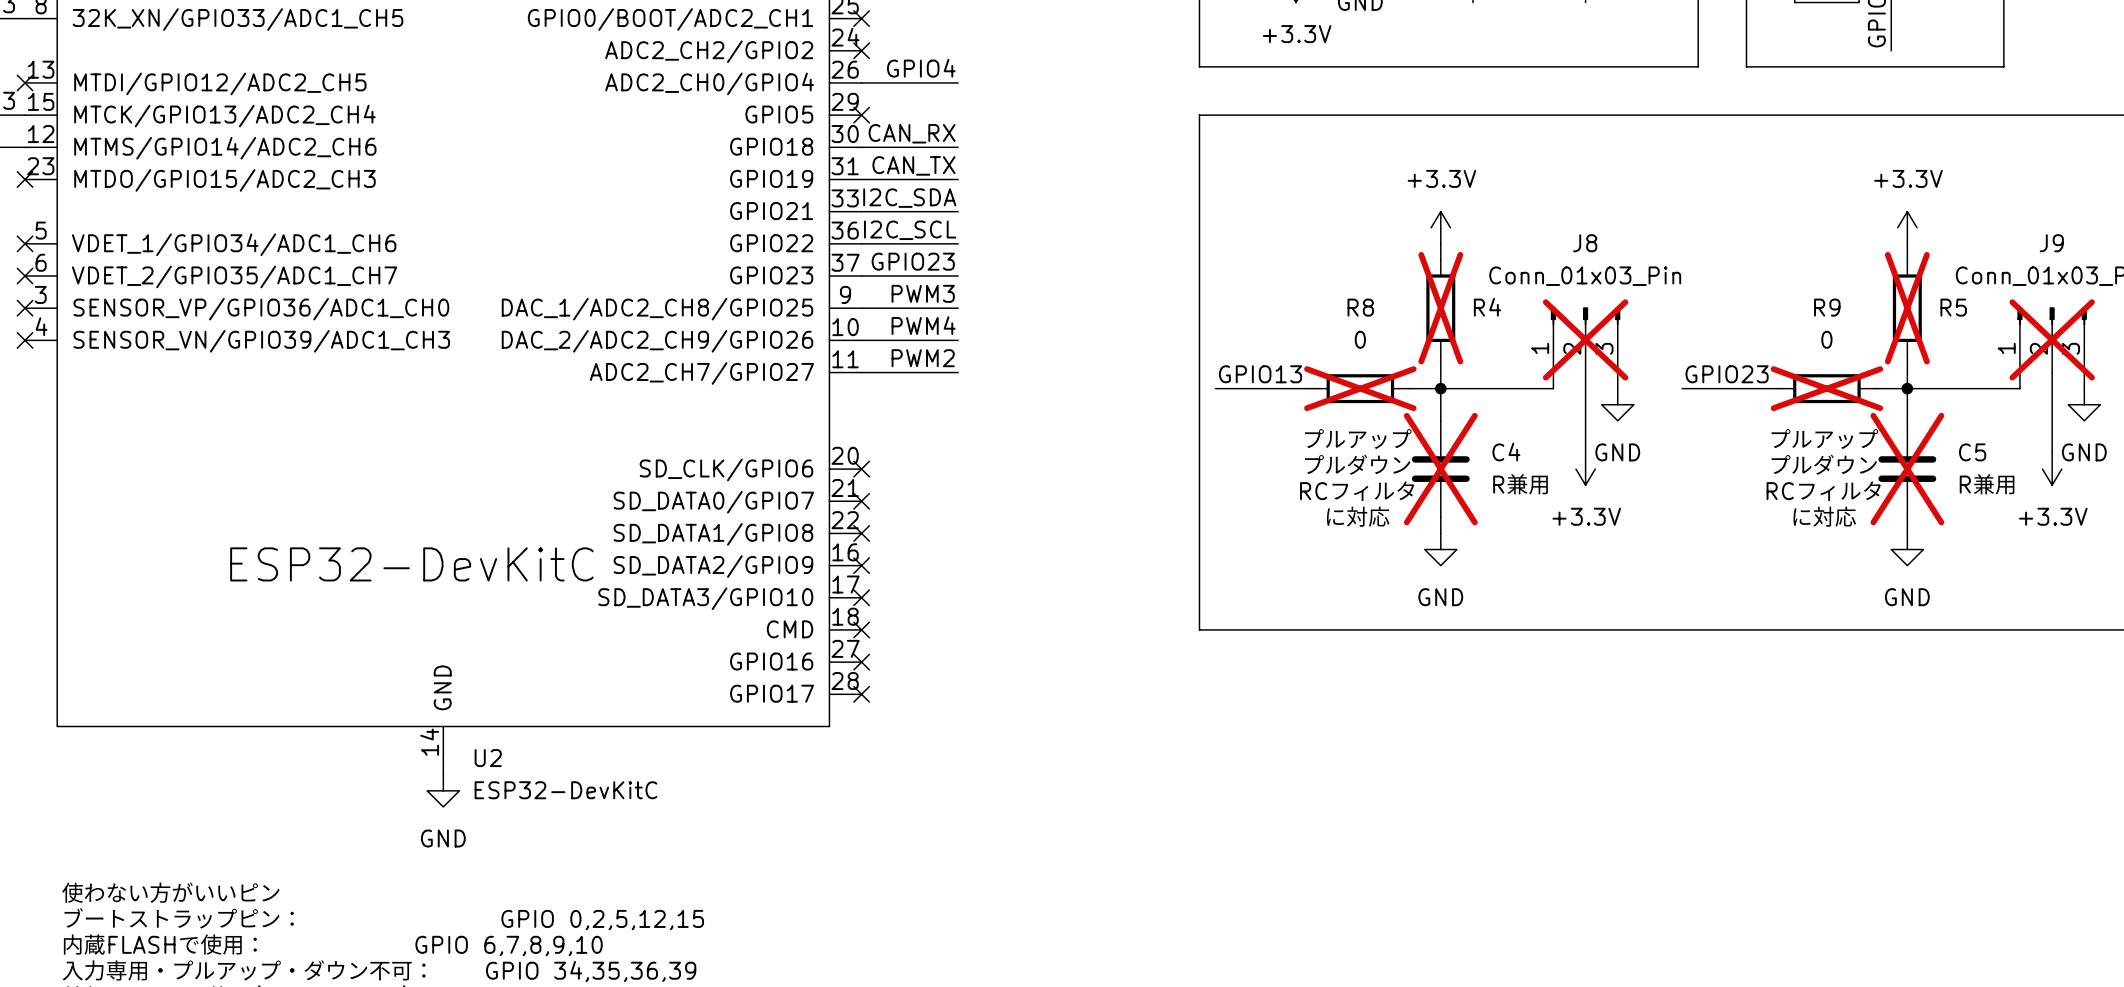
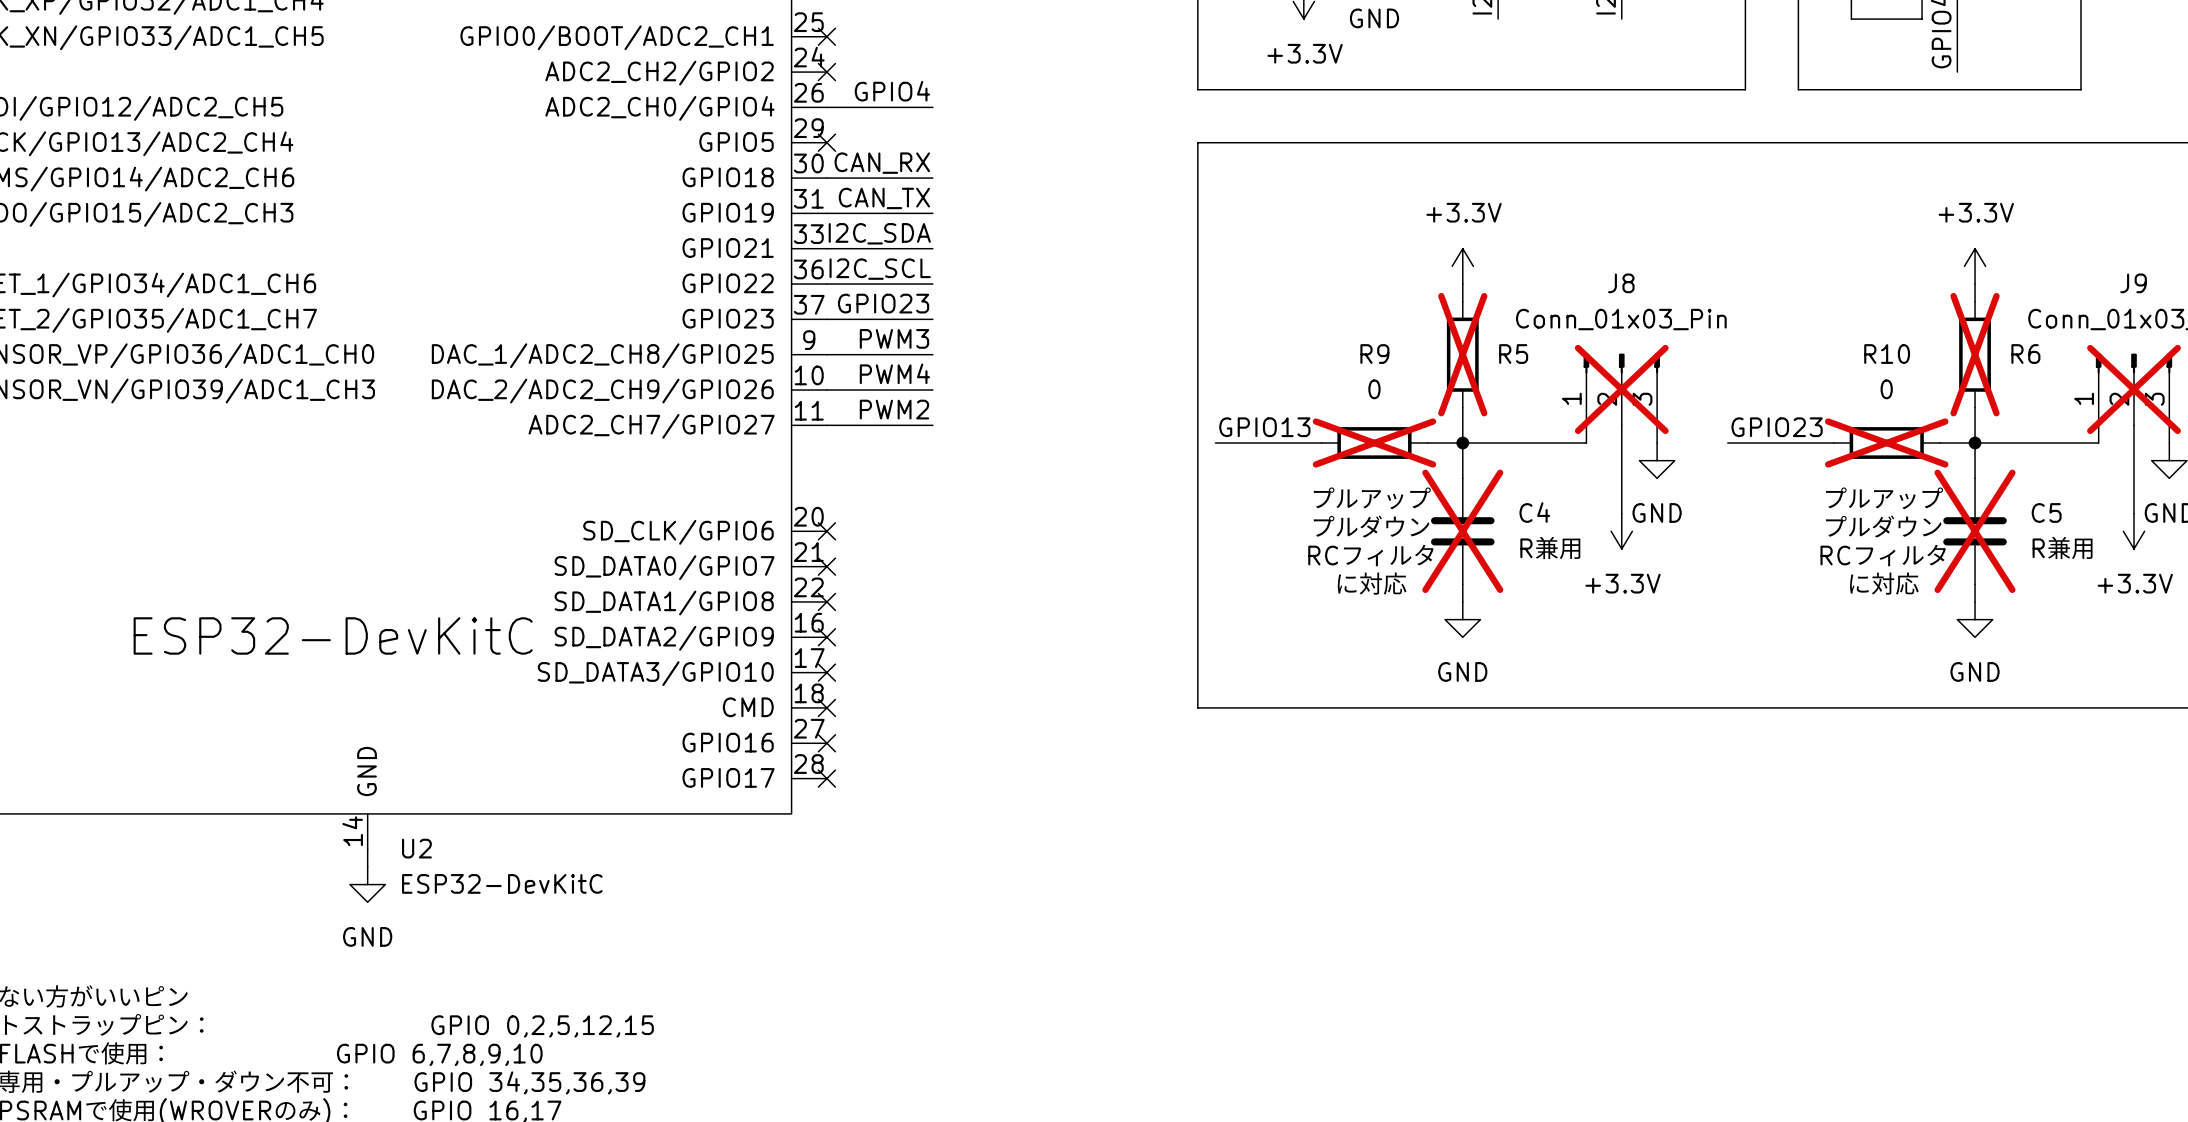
R8 name: R8 (1360, 307) -> R9 (1374, 354)
R4 name: R4 (1487, 307) -> R5 (1513, 354)
R9 name: R9 (1827, 307) -> R10 (1887, 354)
R5 name: R5 (1953, 307) -> R6 (2025, 354)

